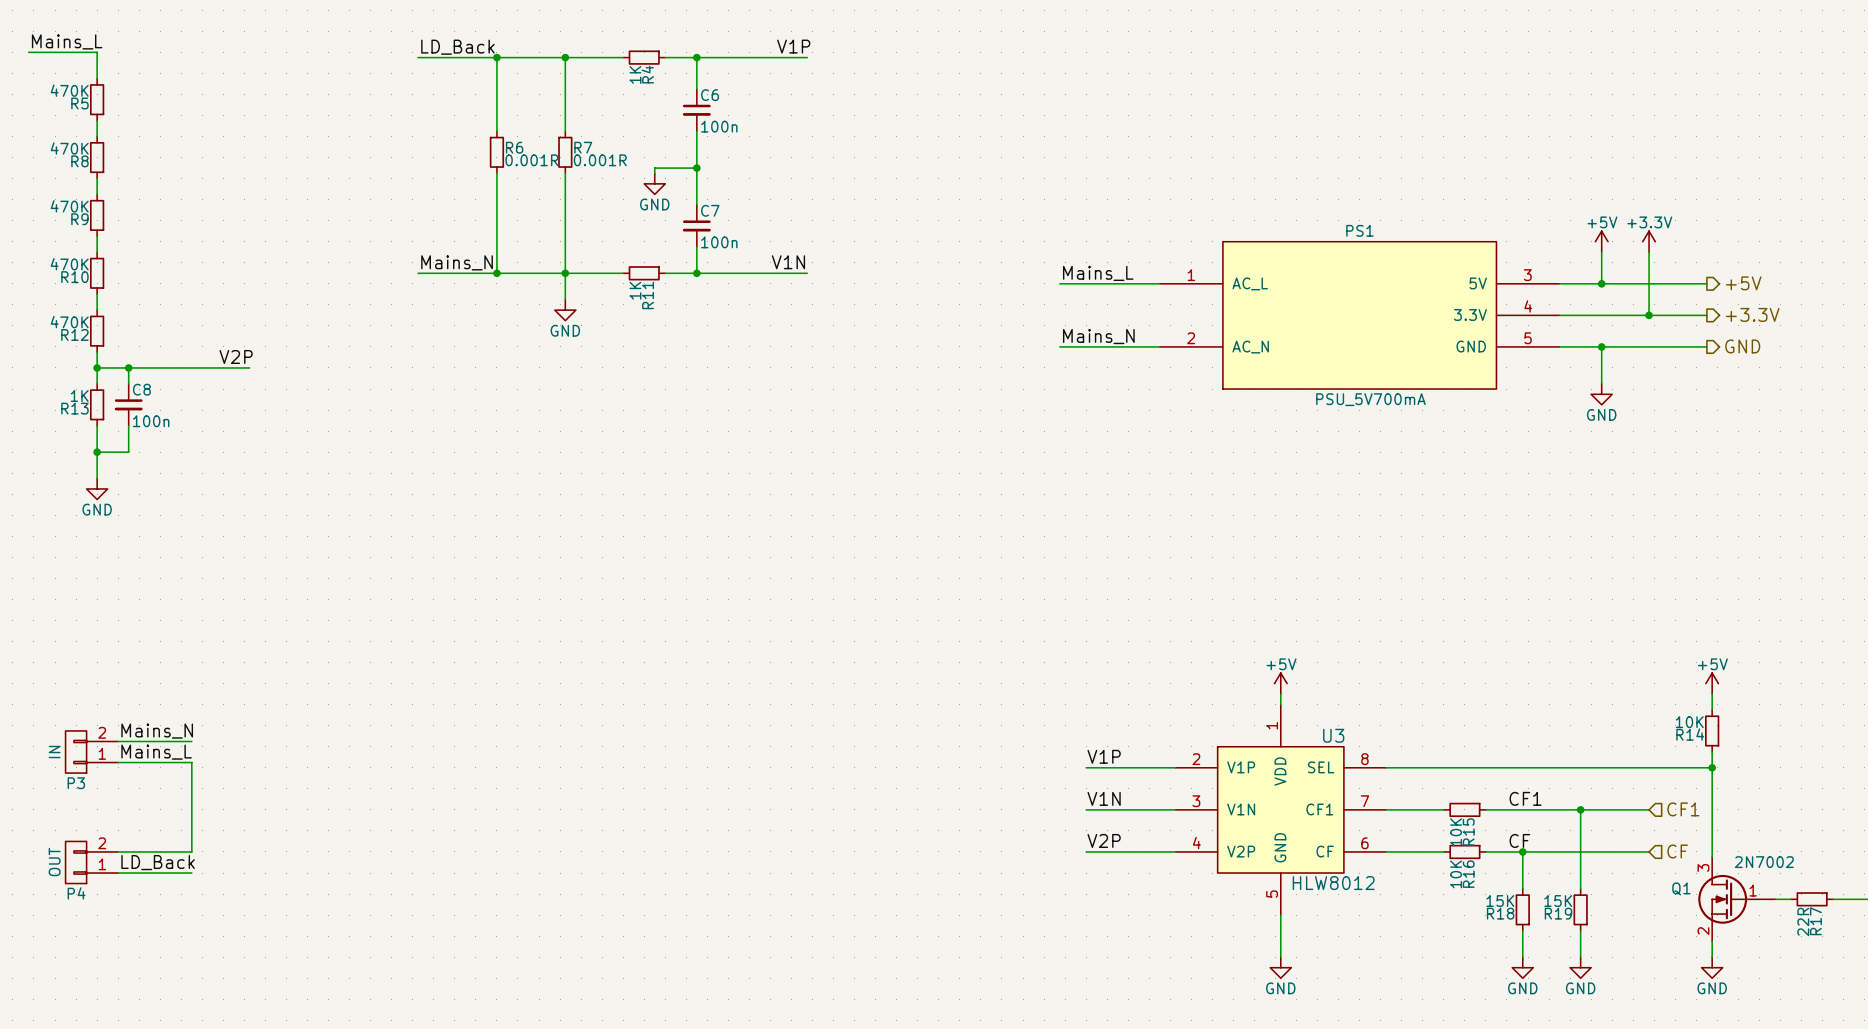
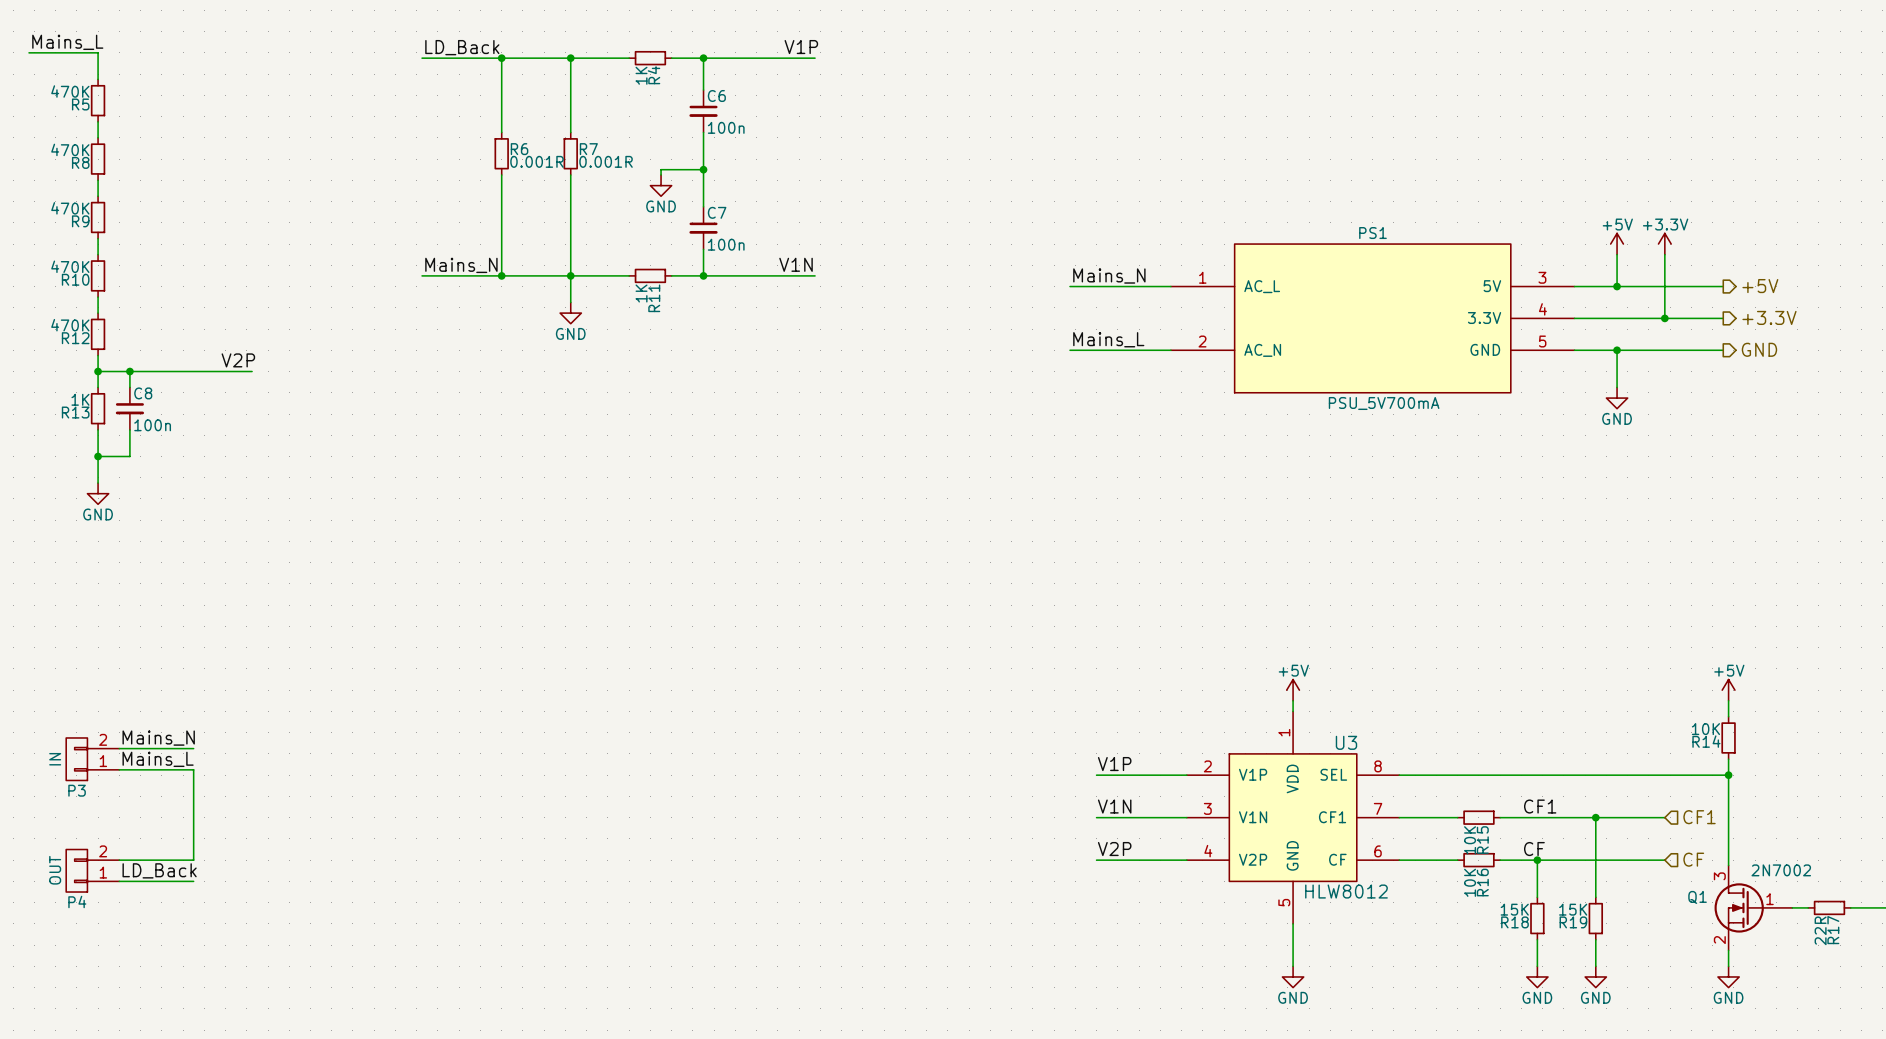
label: Mains_L (1098, 273) -> Mains_N (1109, 276)
label: Mains_N (1098, 336) -> Mains_L (1108, 339)

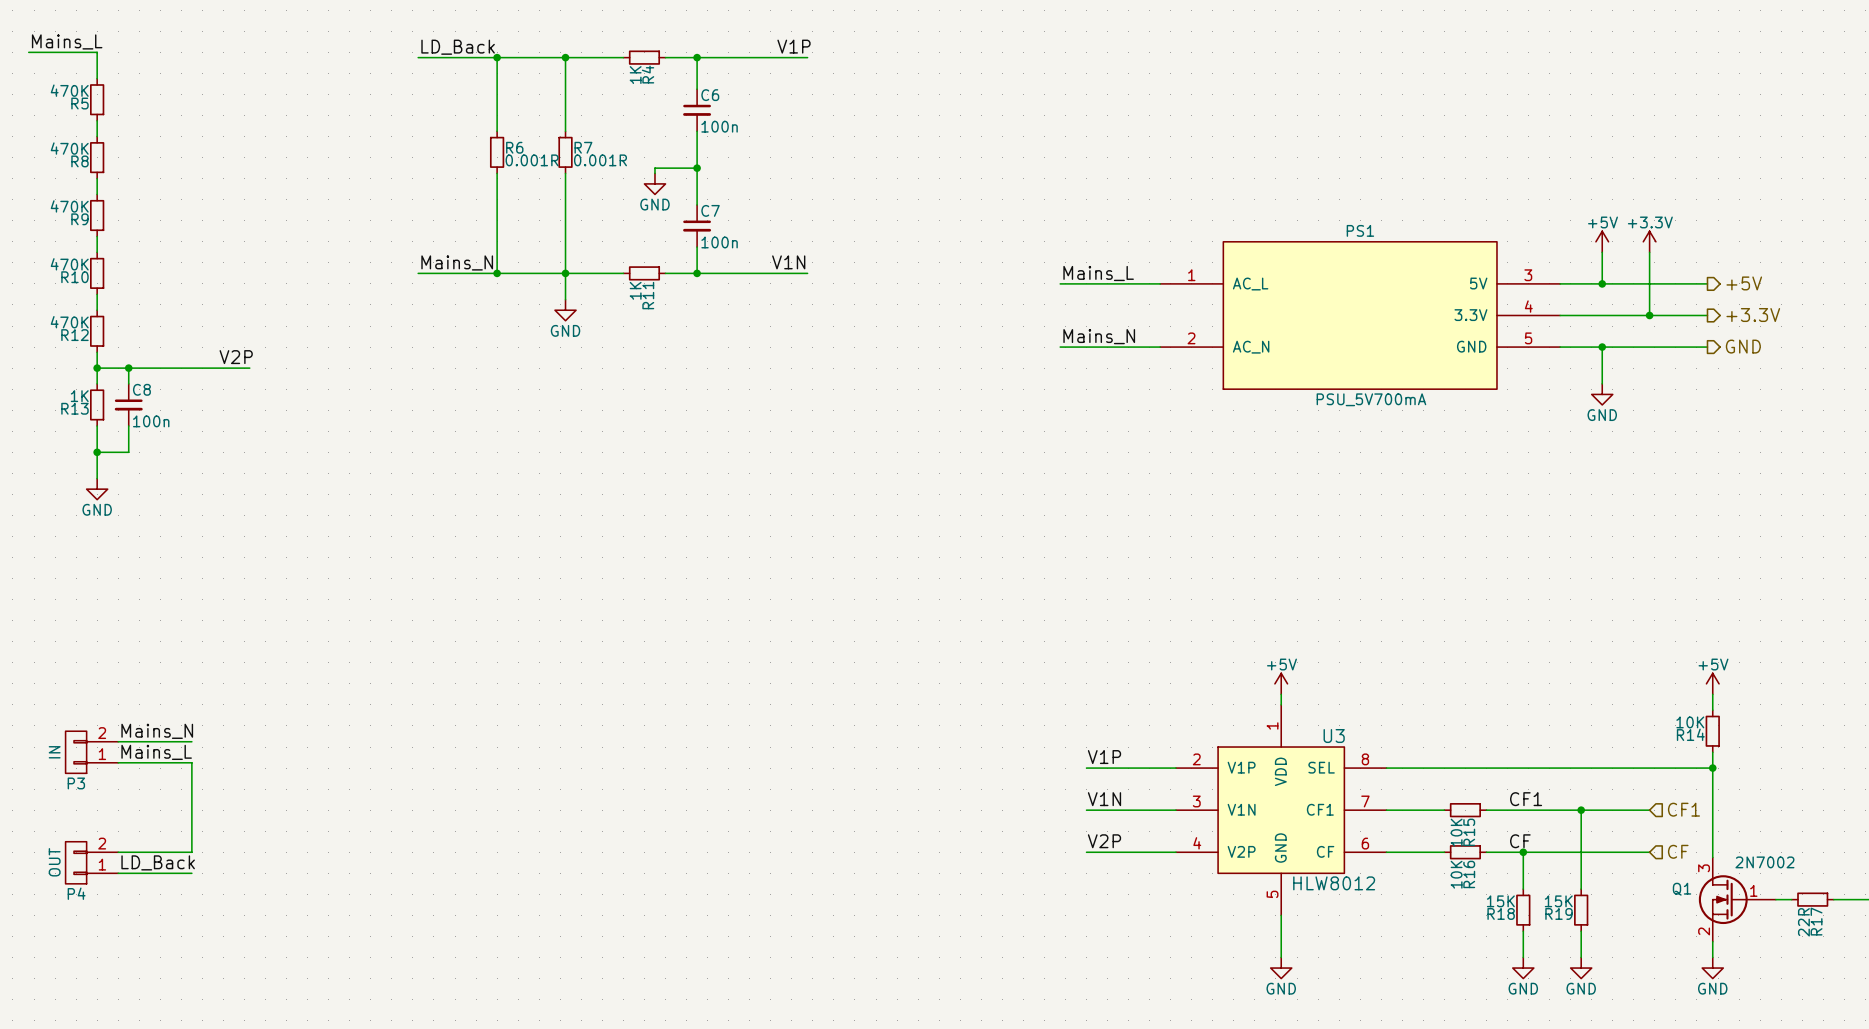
label: Mains_N (1109, 276) -> Mains_L (1098, 273)
label: Mains_L (1108, 339) -> Mains_N (1099, 336)

